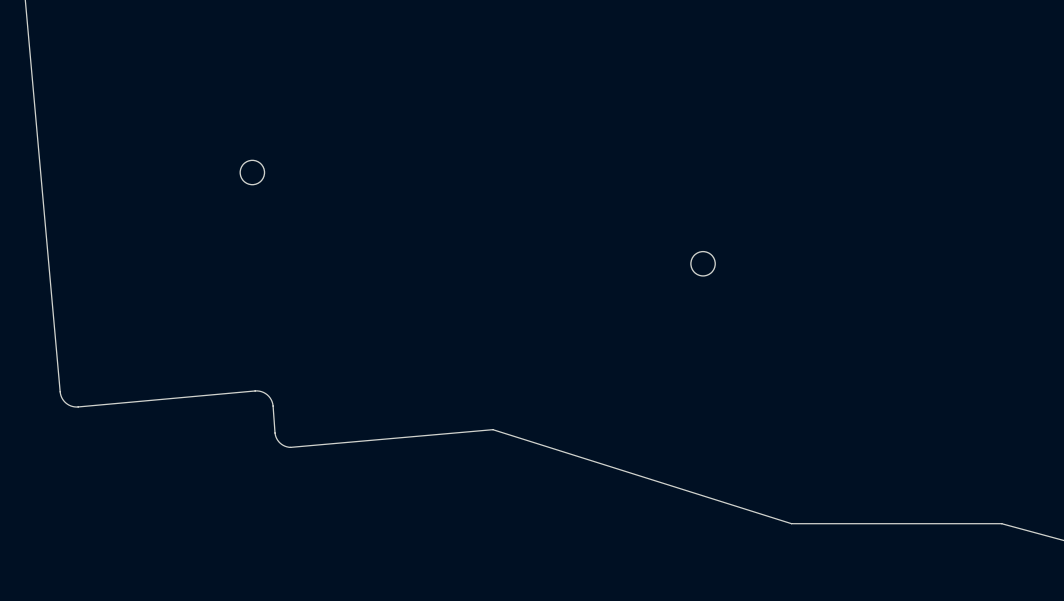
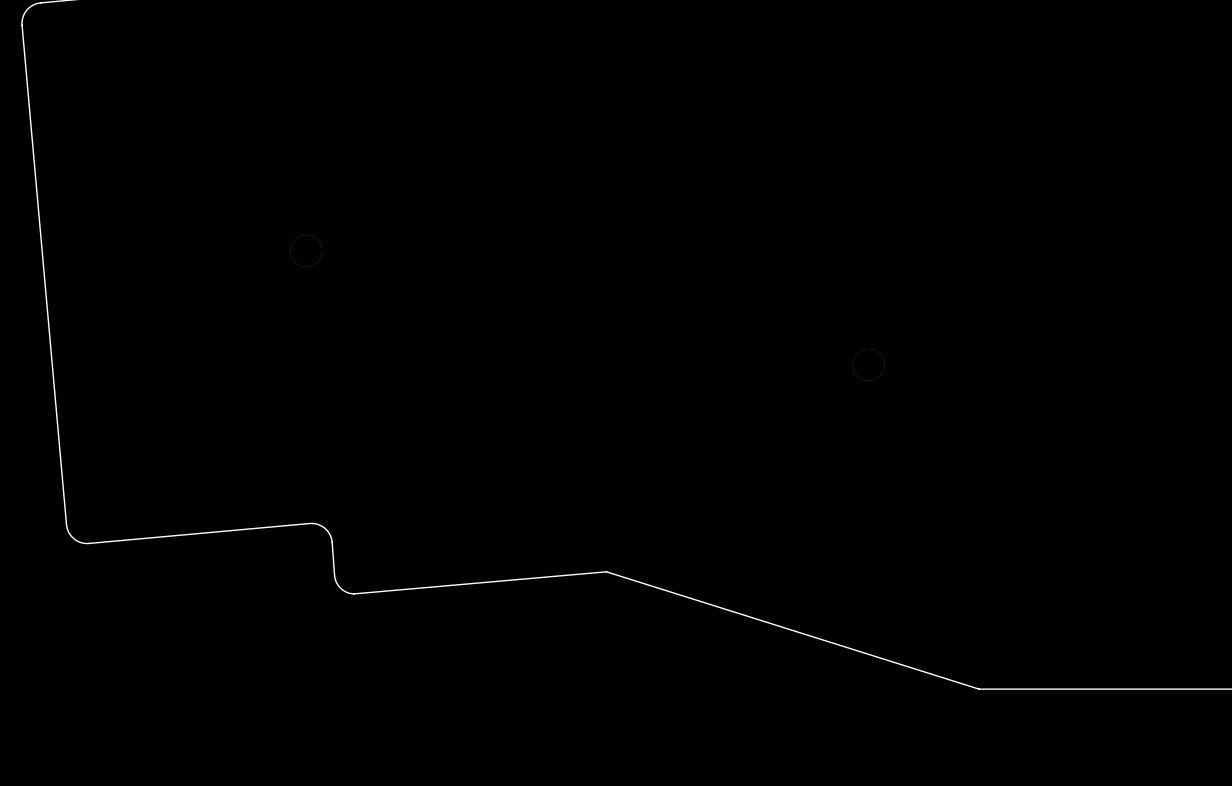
drawing: [239, 159, 266, 186] -> none
drawing: [690, 250, 716, 277] -> none

